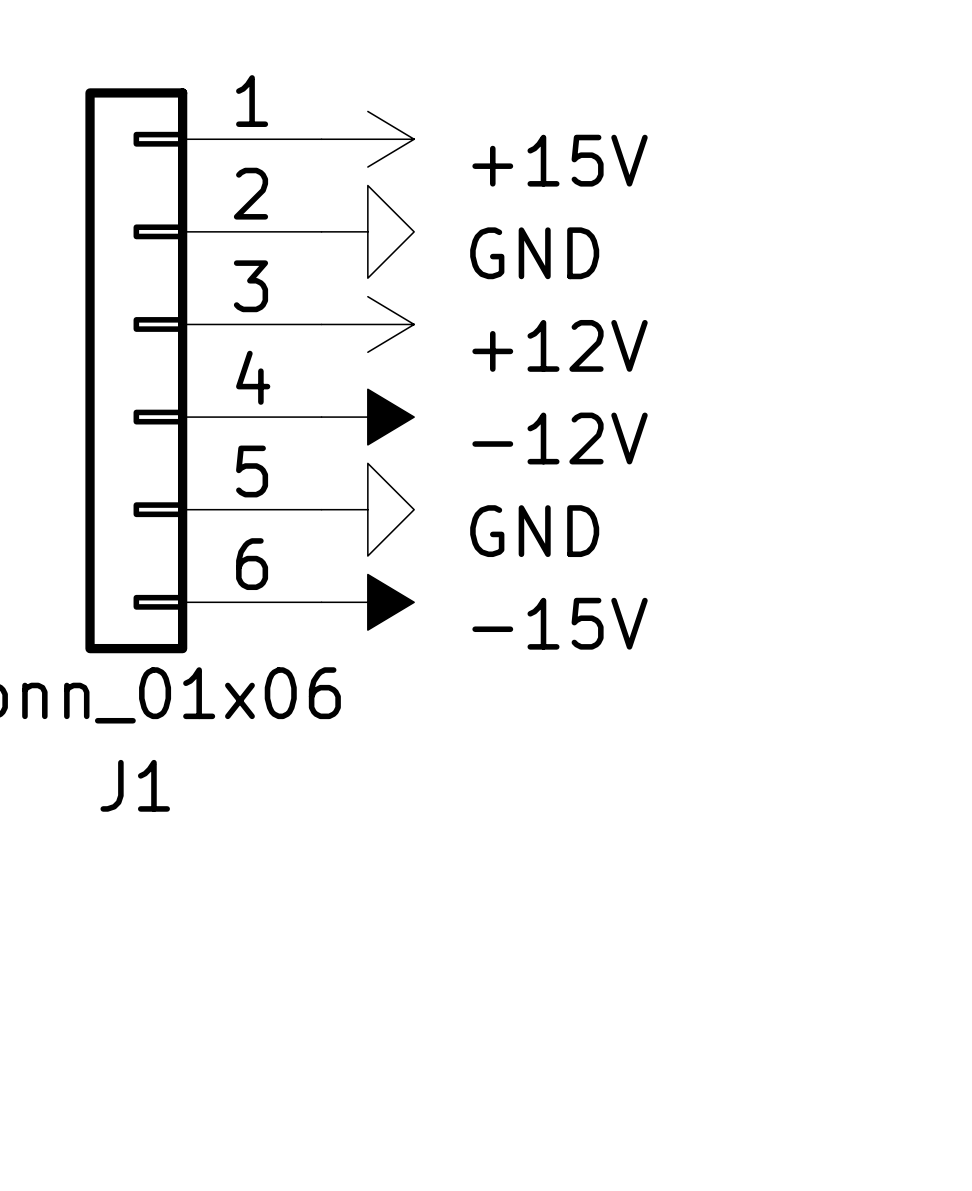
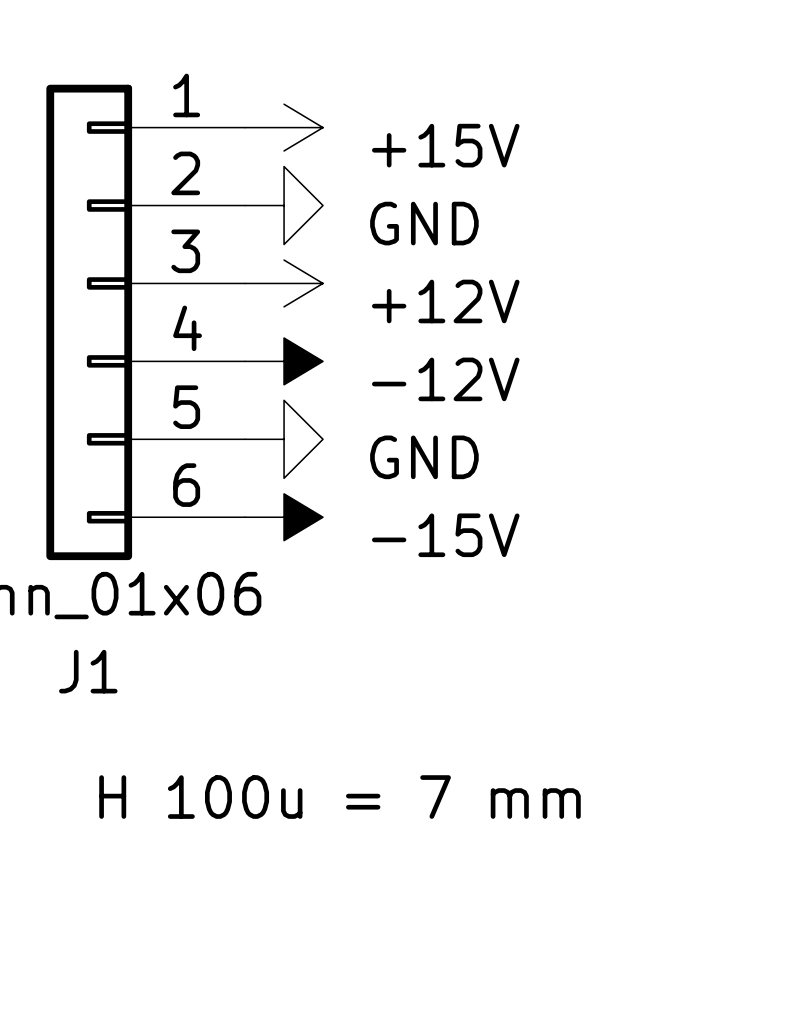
text: none -> H 100u = 7 mm (340, 797)

